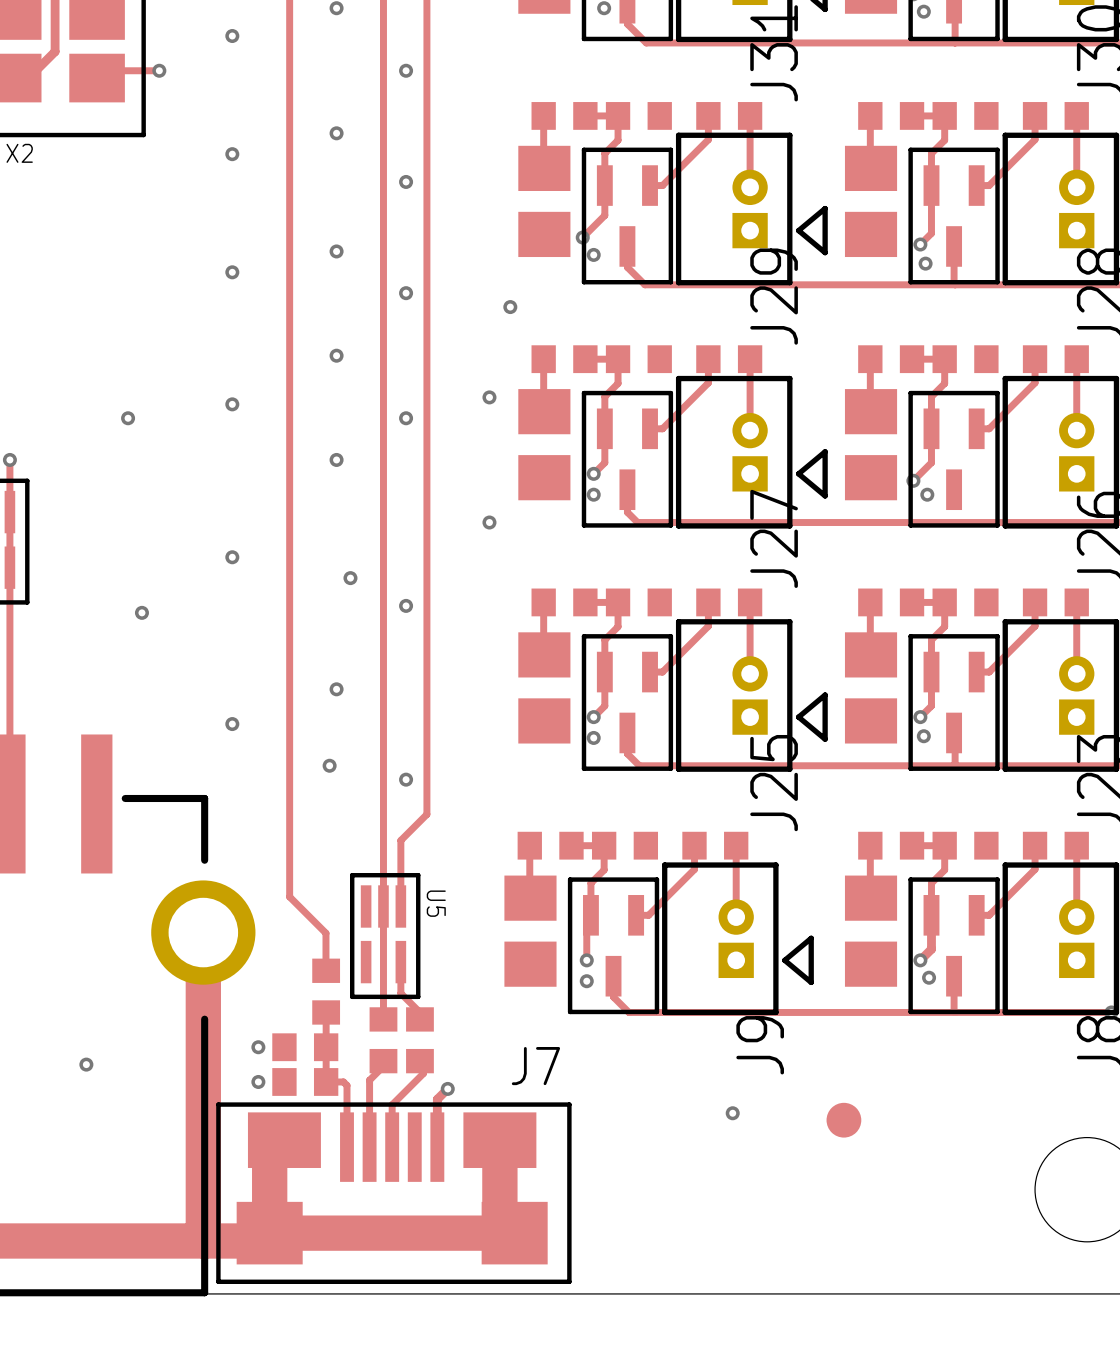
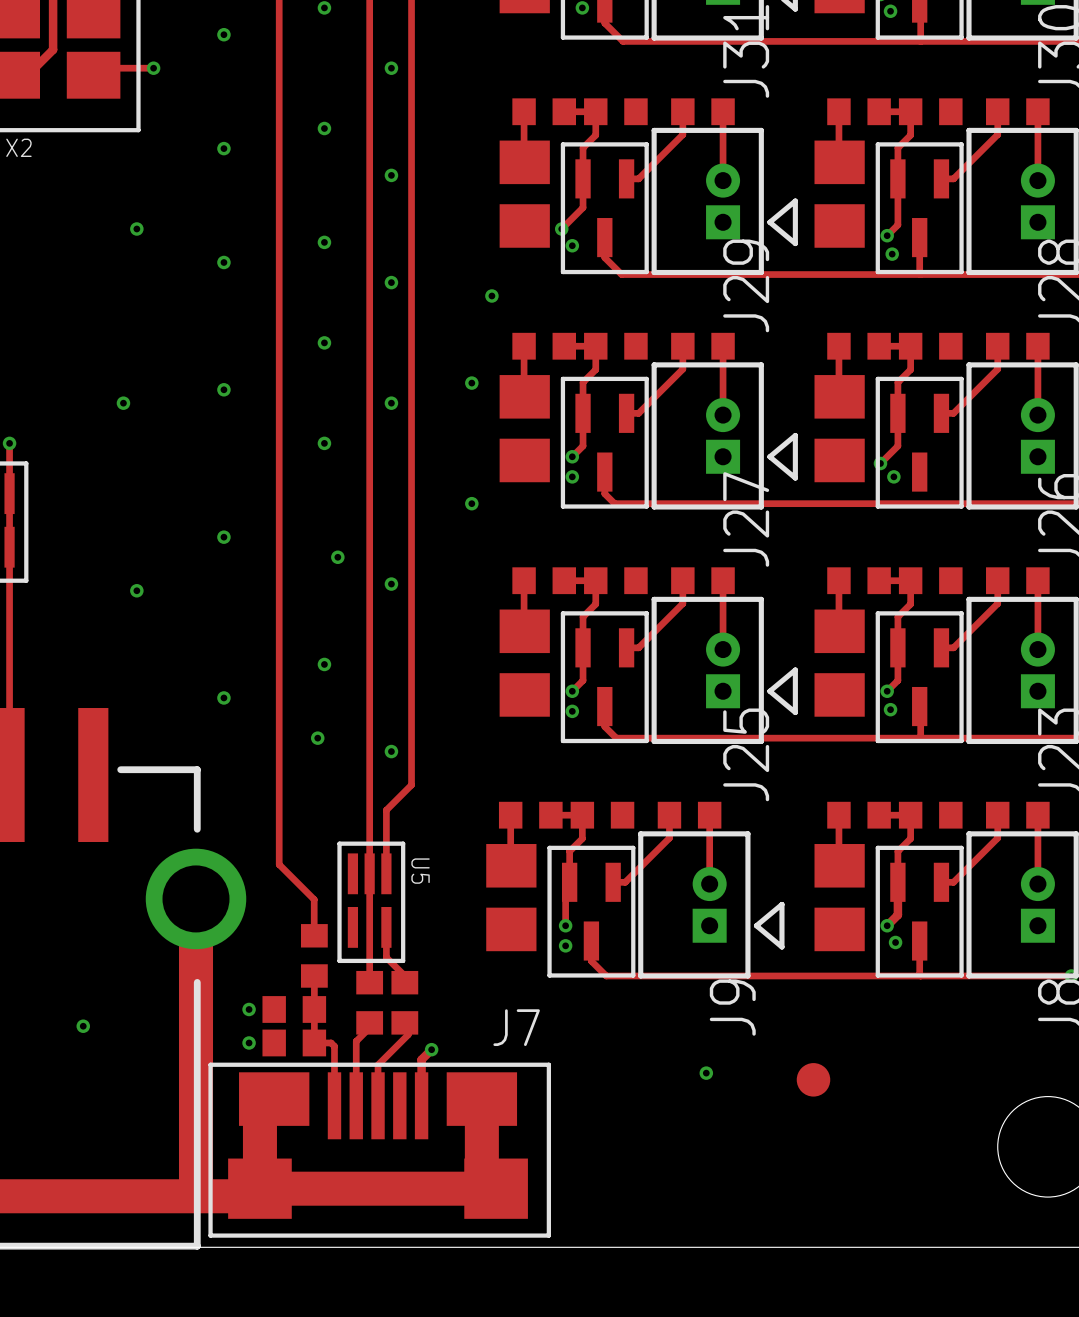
via: none -> (136, 228)

